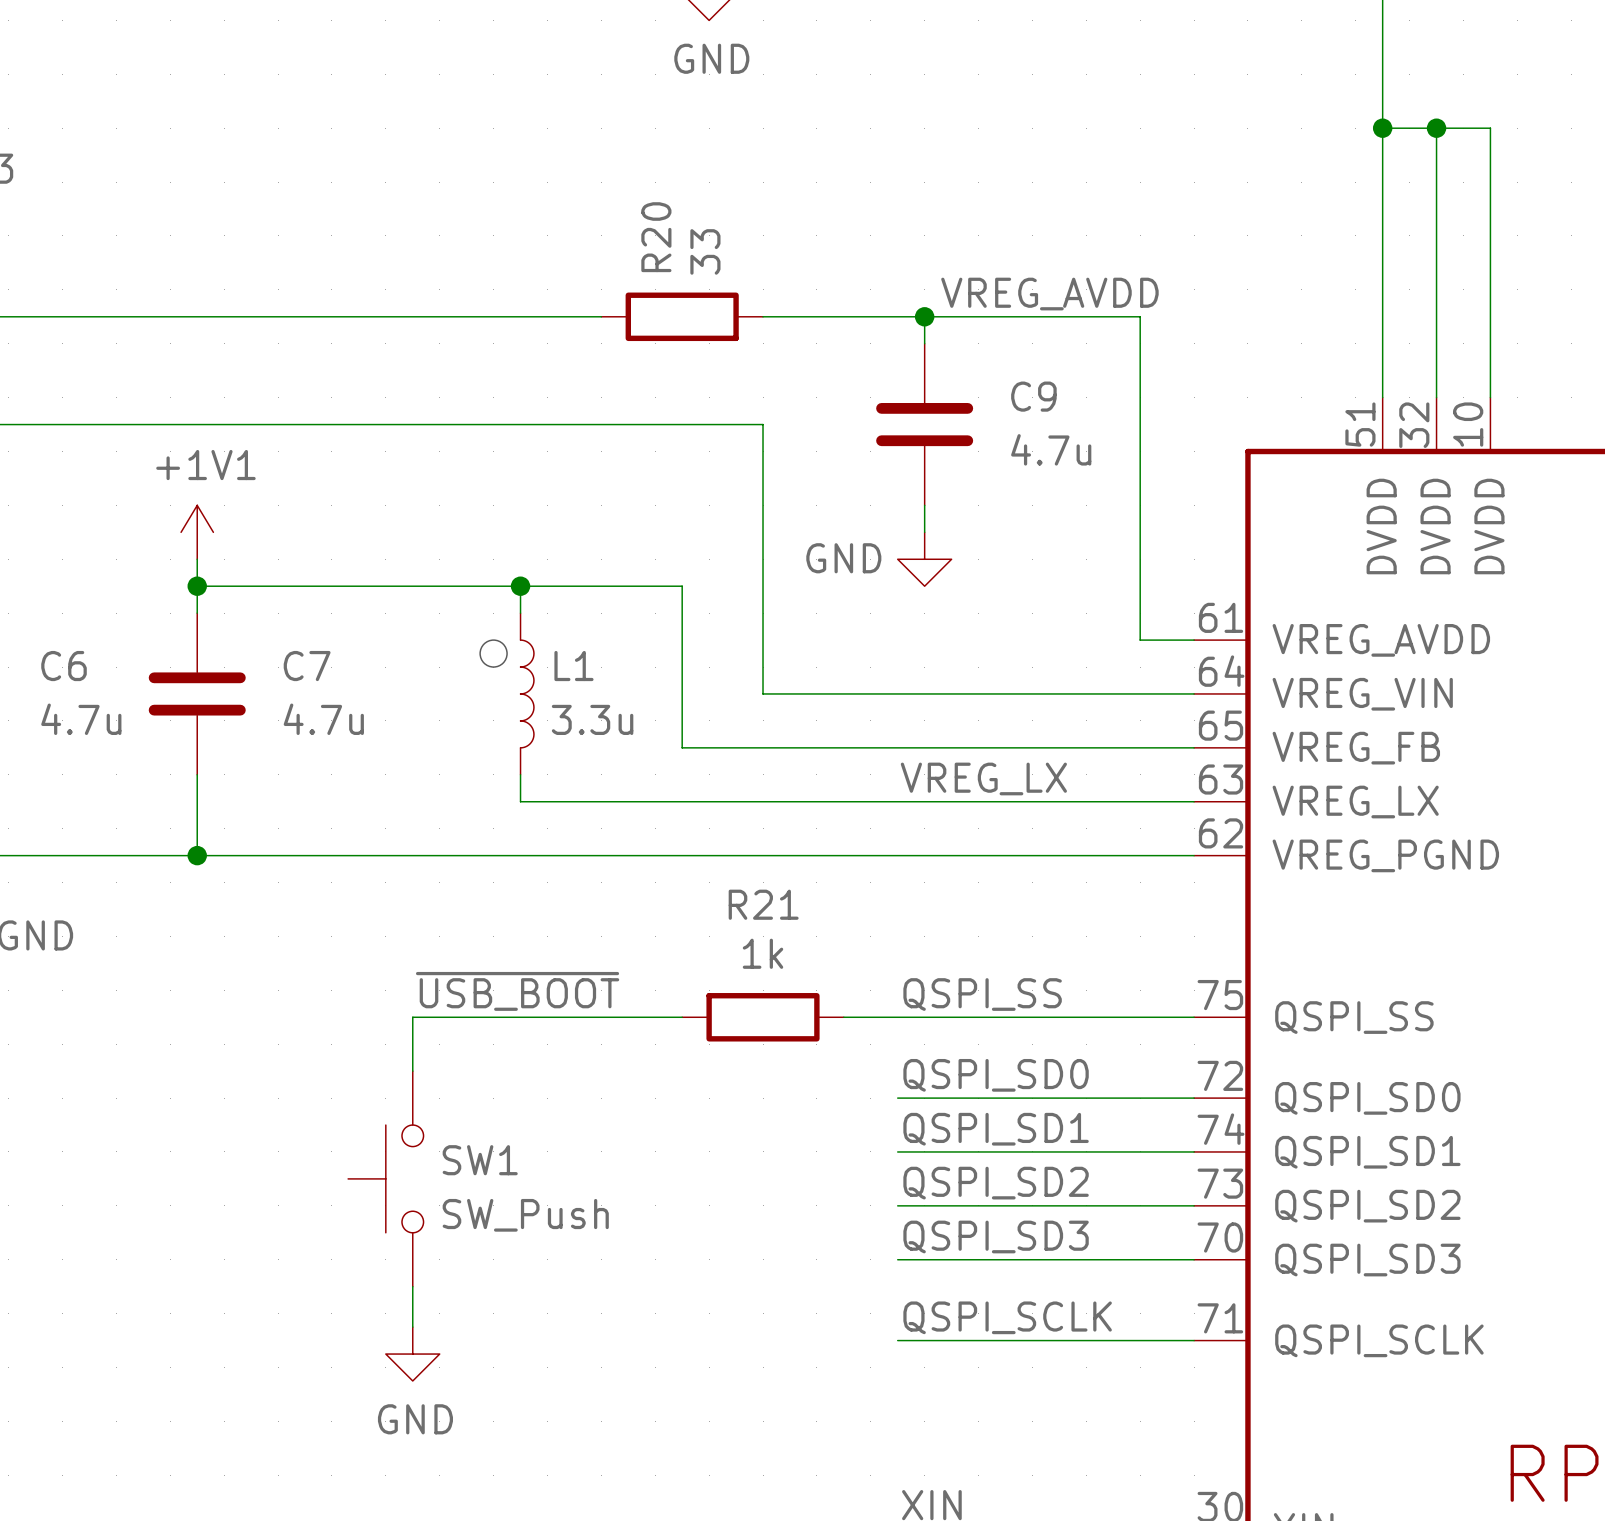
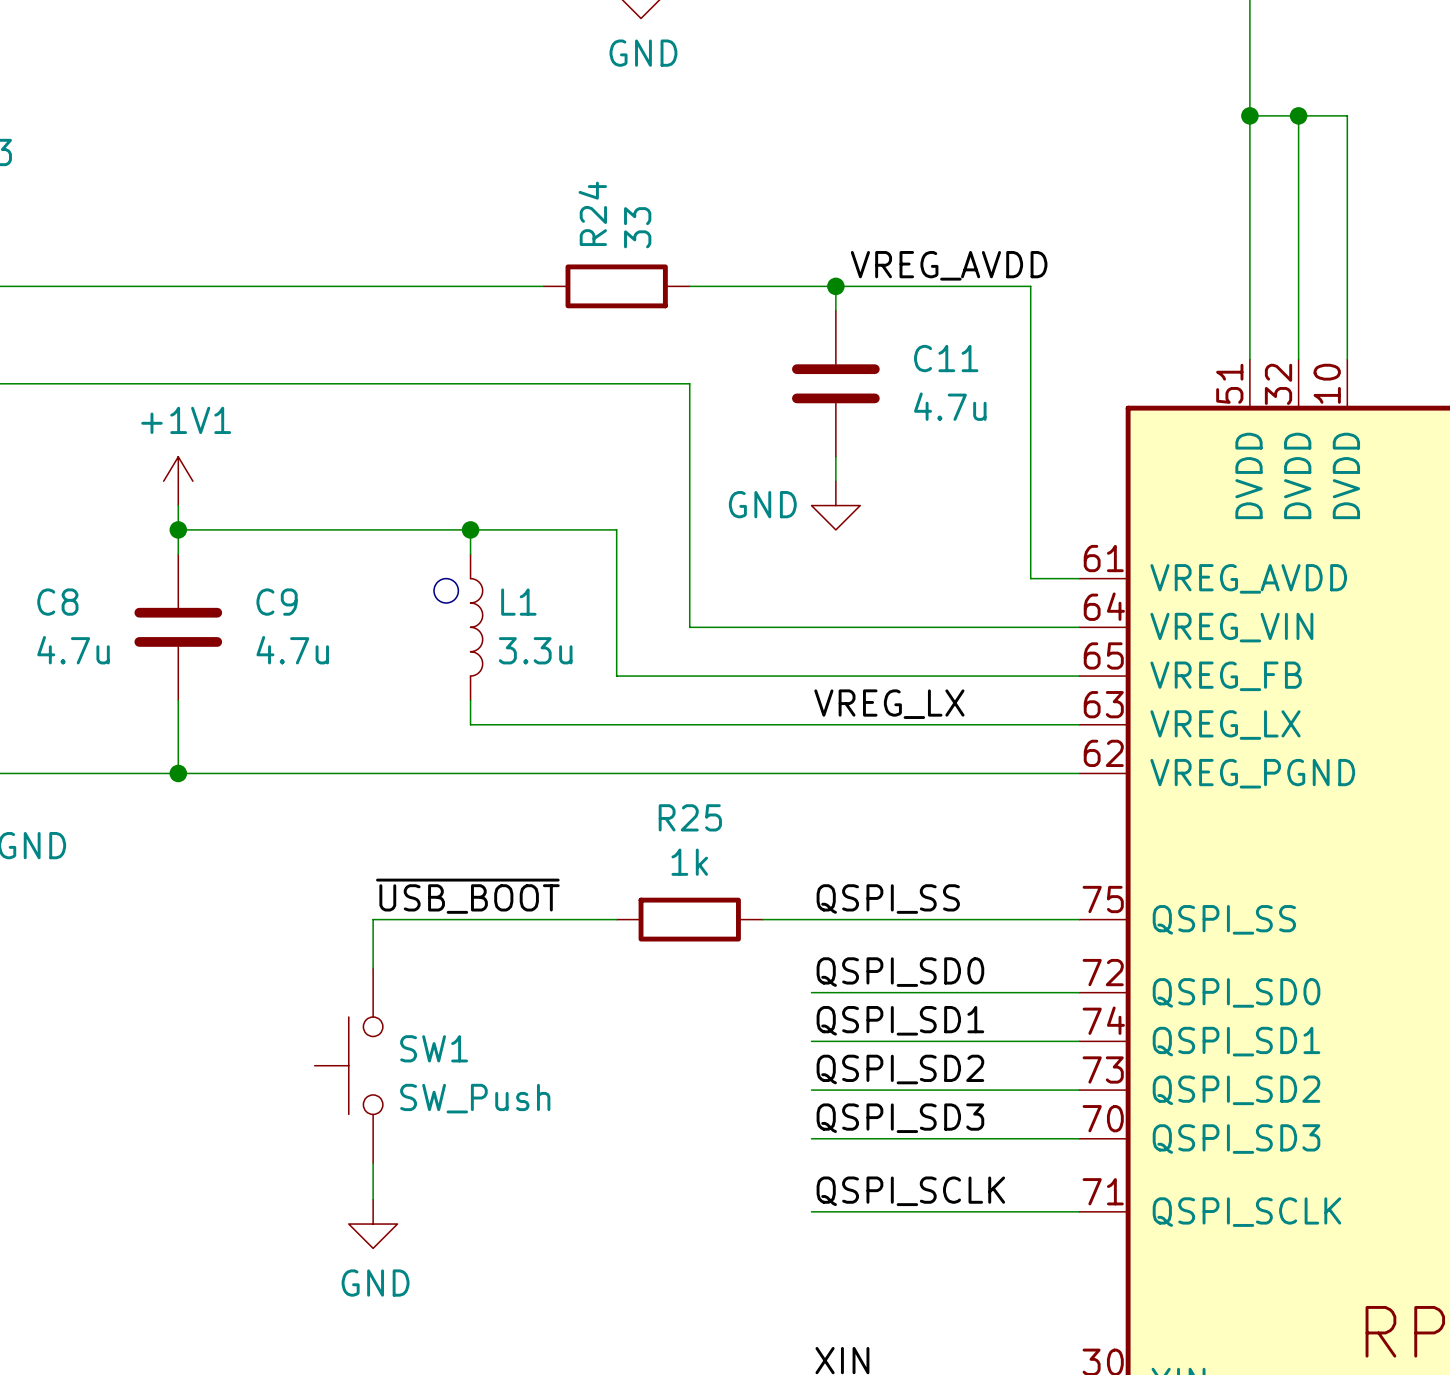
R20 name: R20 (656, 237) -> R24 (592, 213)
C9 name: C9 (1033, 396) -> C11 (946, 358)
C6 name: C6 (64, 666) -> C8 (57, 602)
C7 name: C7 (307, 666) -> C9 (277, 602)
R21 name: R21 (763, 904) -> R25 (690, 817)

